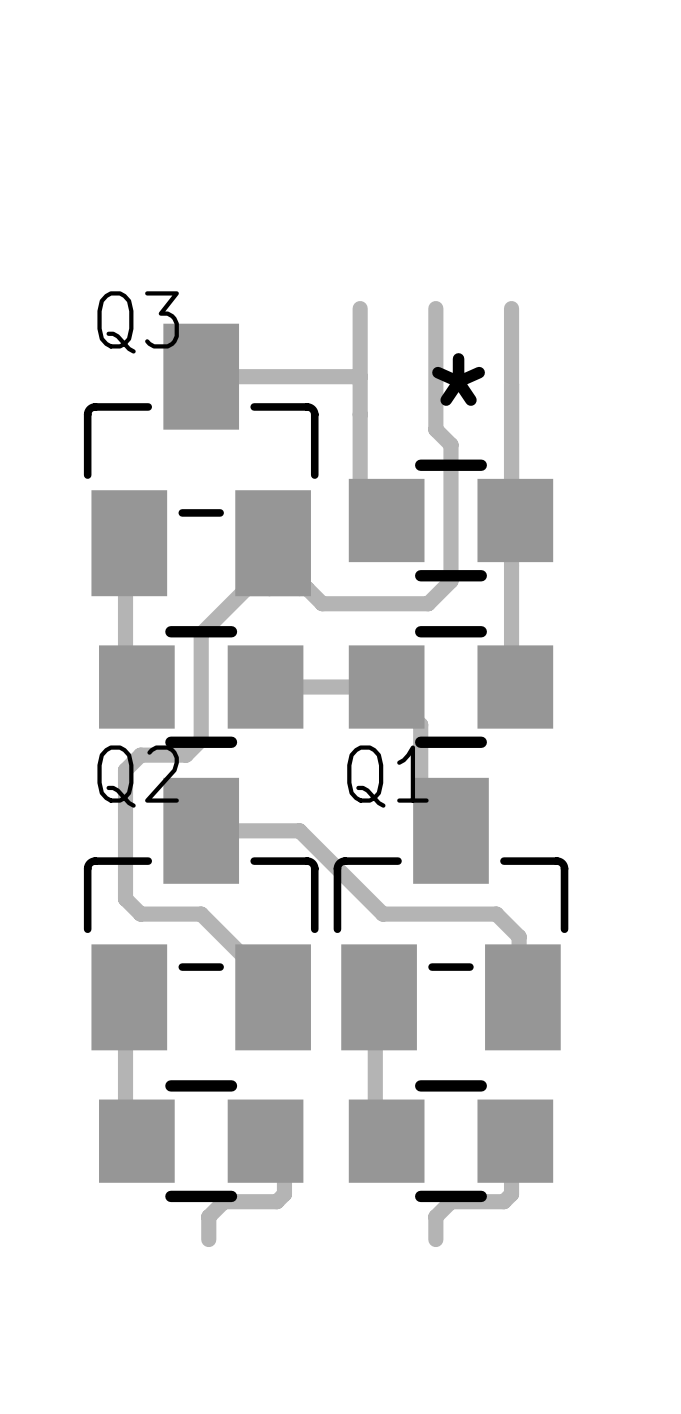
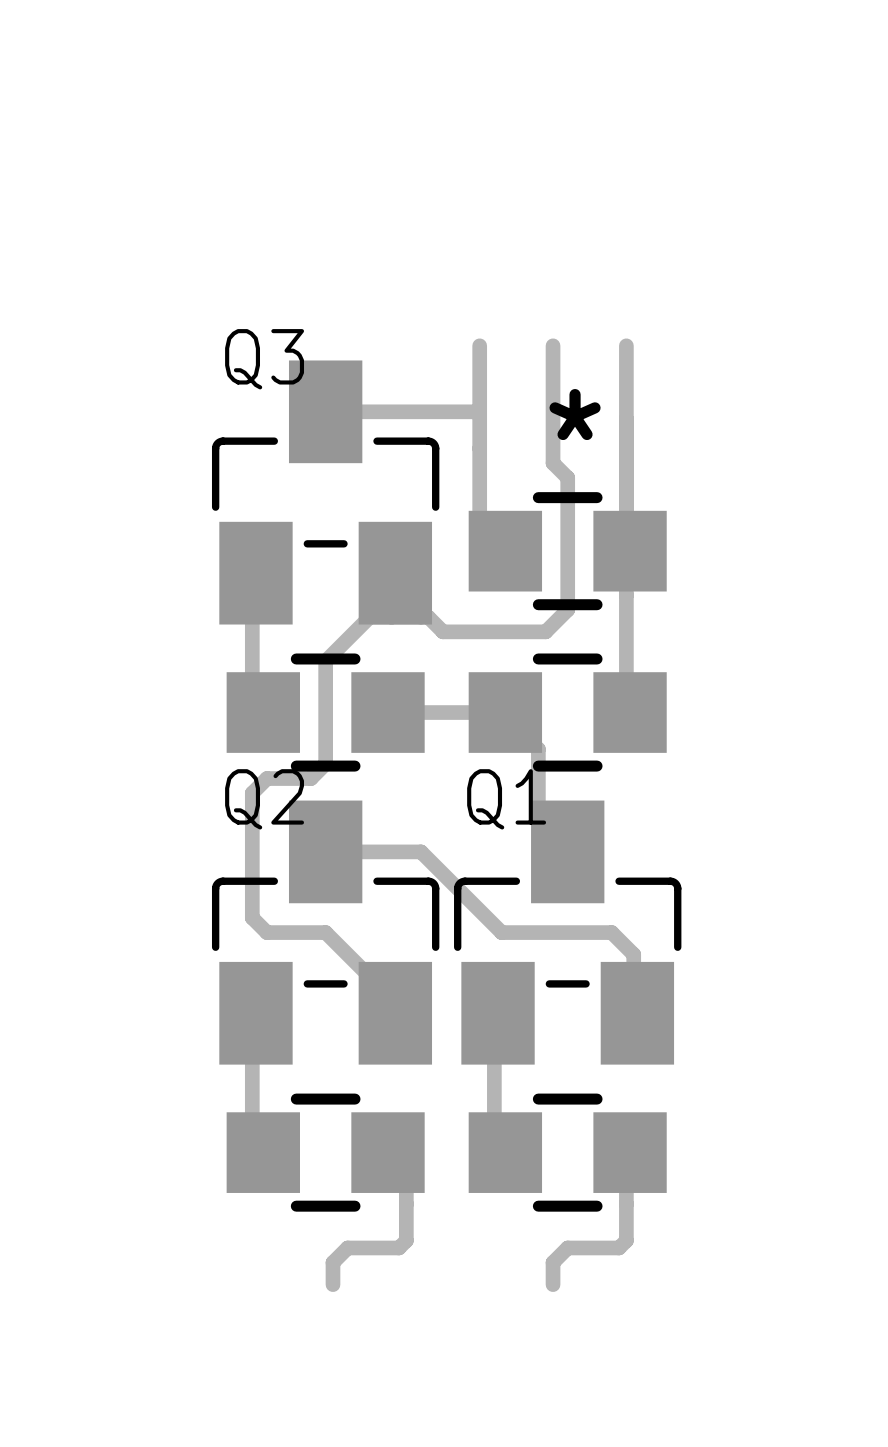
track: (284, 1194) (276, 1201) (223, 1201) (208, 1216) (208, 1239) -> (406, 1203) (406, 1240) (399, 1247) (347, 1247) (332, 1262) (332, 1284)
track: (511, 1194) (503, 1201) (450, 1201) (435, 1216) (435, 1239) -> (626, 1203) (626, 1240) (619, 1247) (567, 1247) (553, 1262) (553, 1284)

